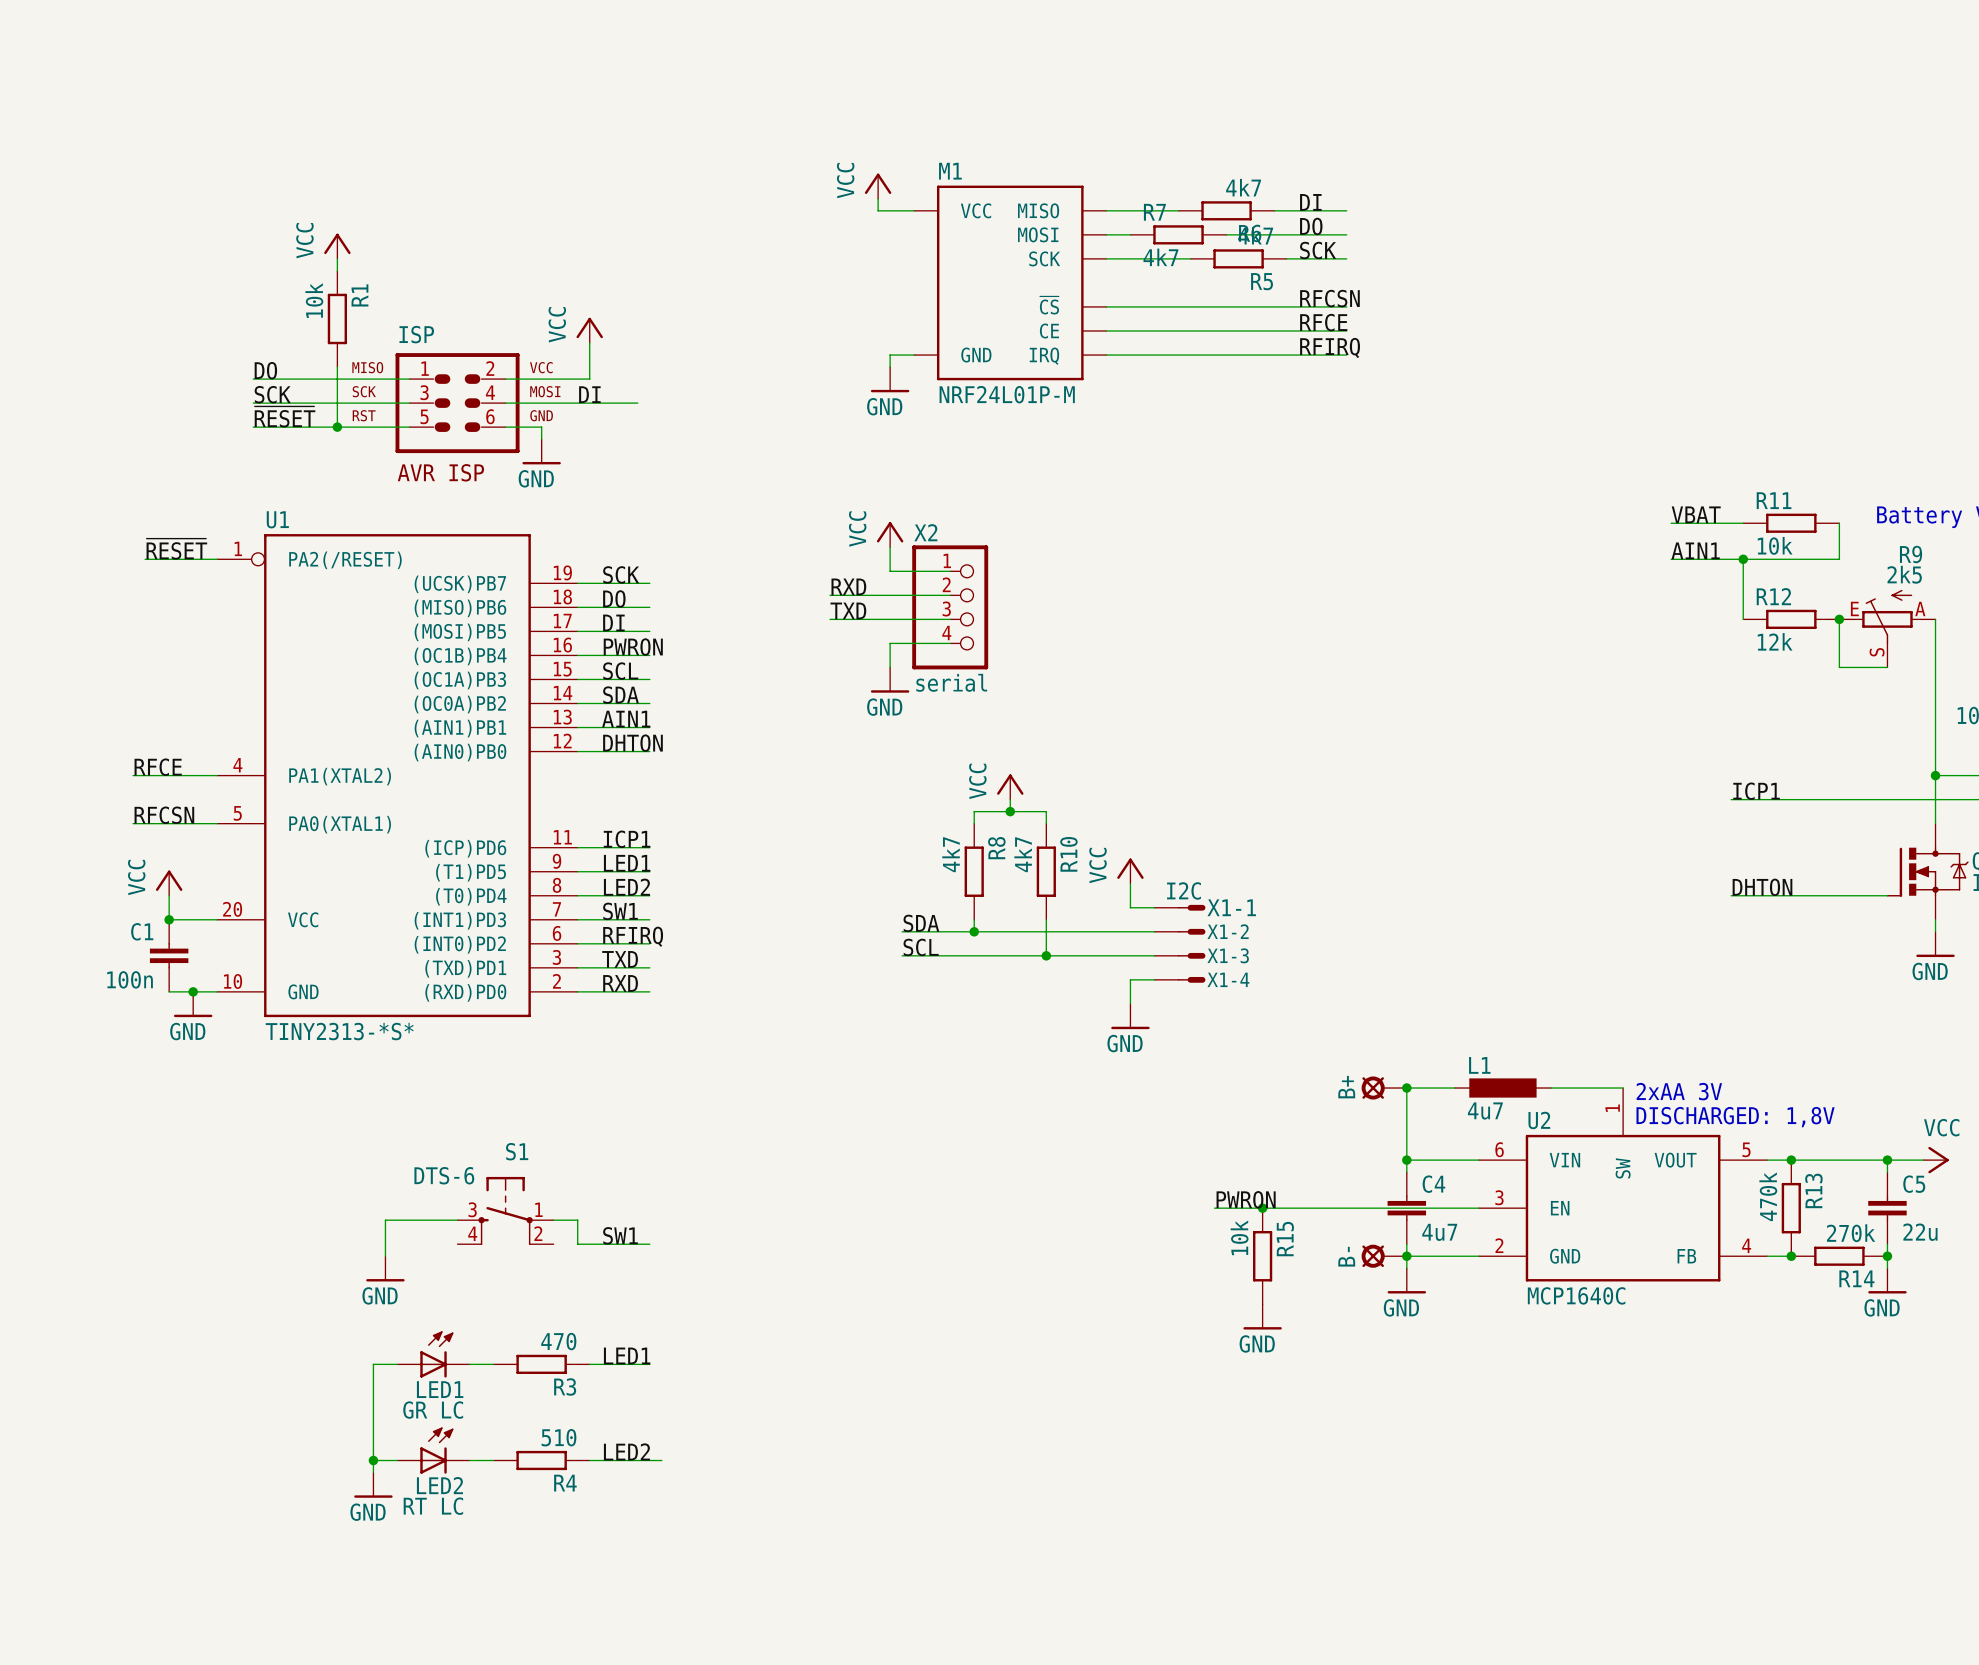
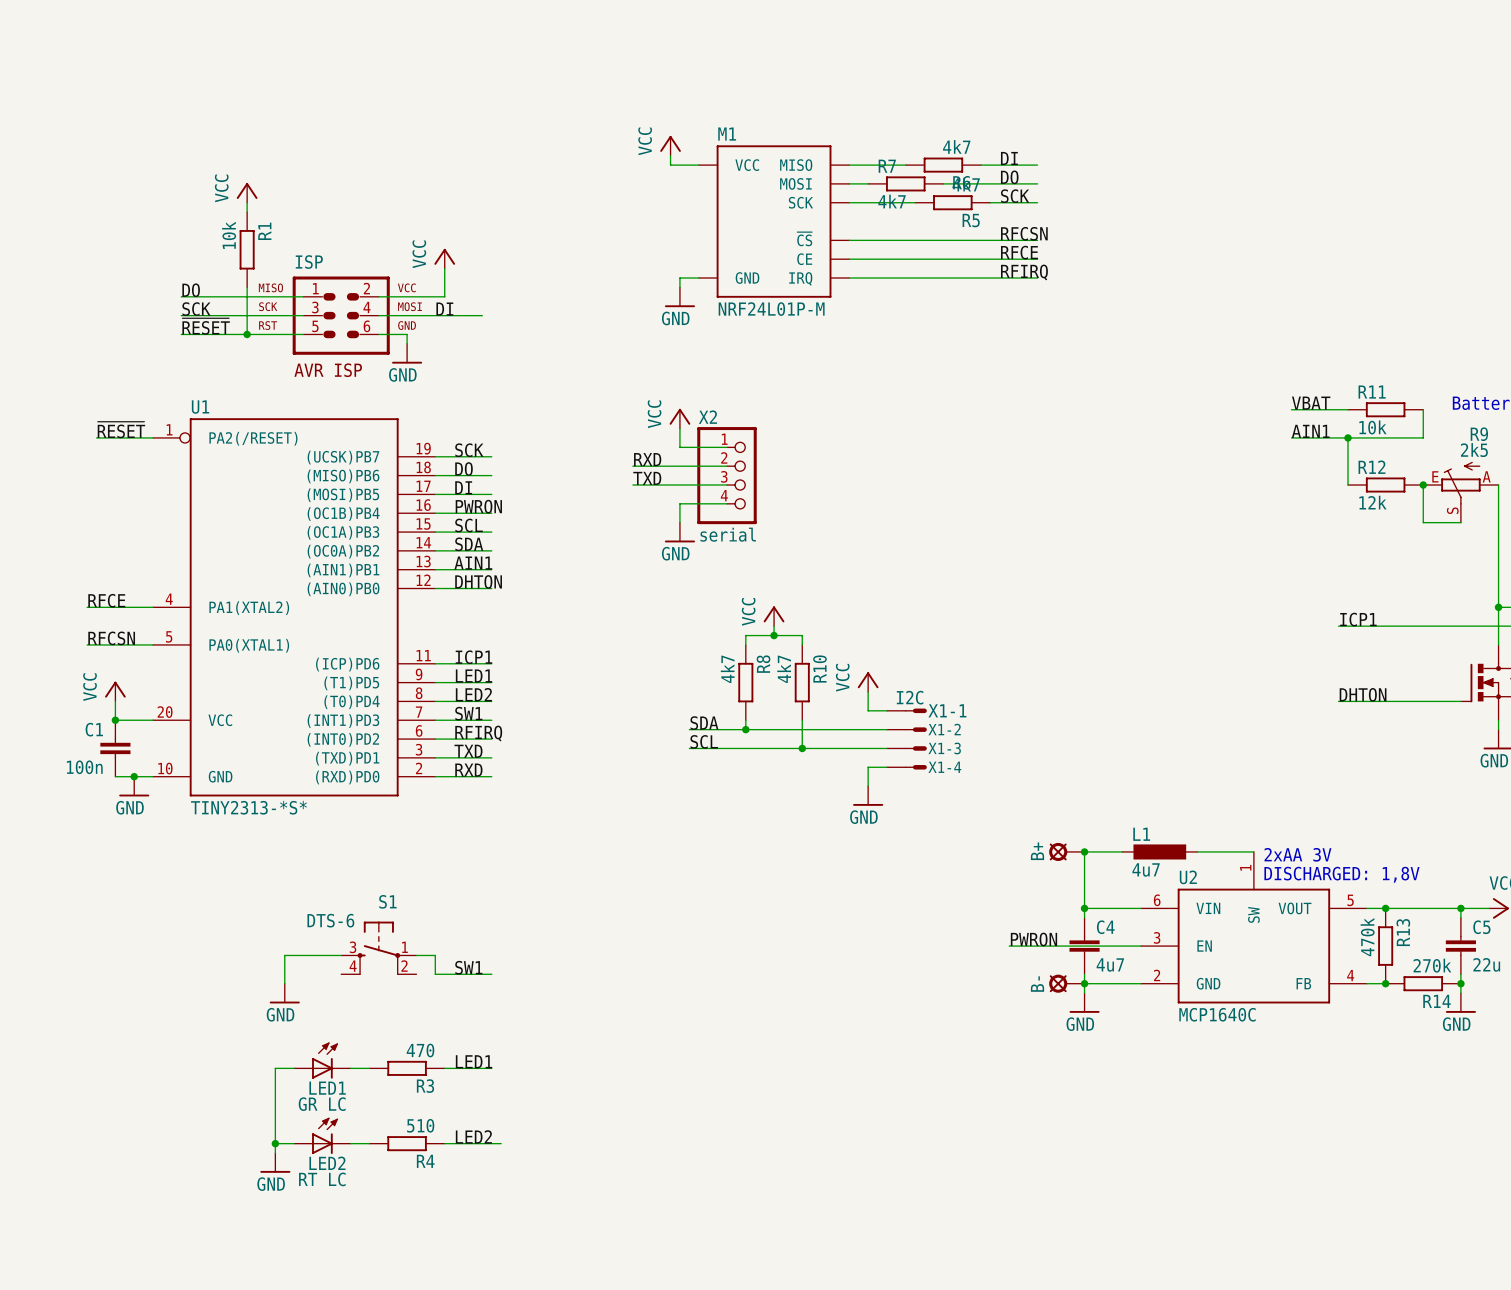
label position: PWRON (1246, 1199) -> PWRON (1033, 939)
wire: (1214, 1208) (1310, 1208) -> none
junction: (1262, 1208) -> none
R15: 10k (1262, 1256) -> none
power symbol: GND (1262, 1316) -> none

